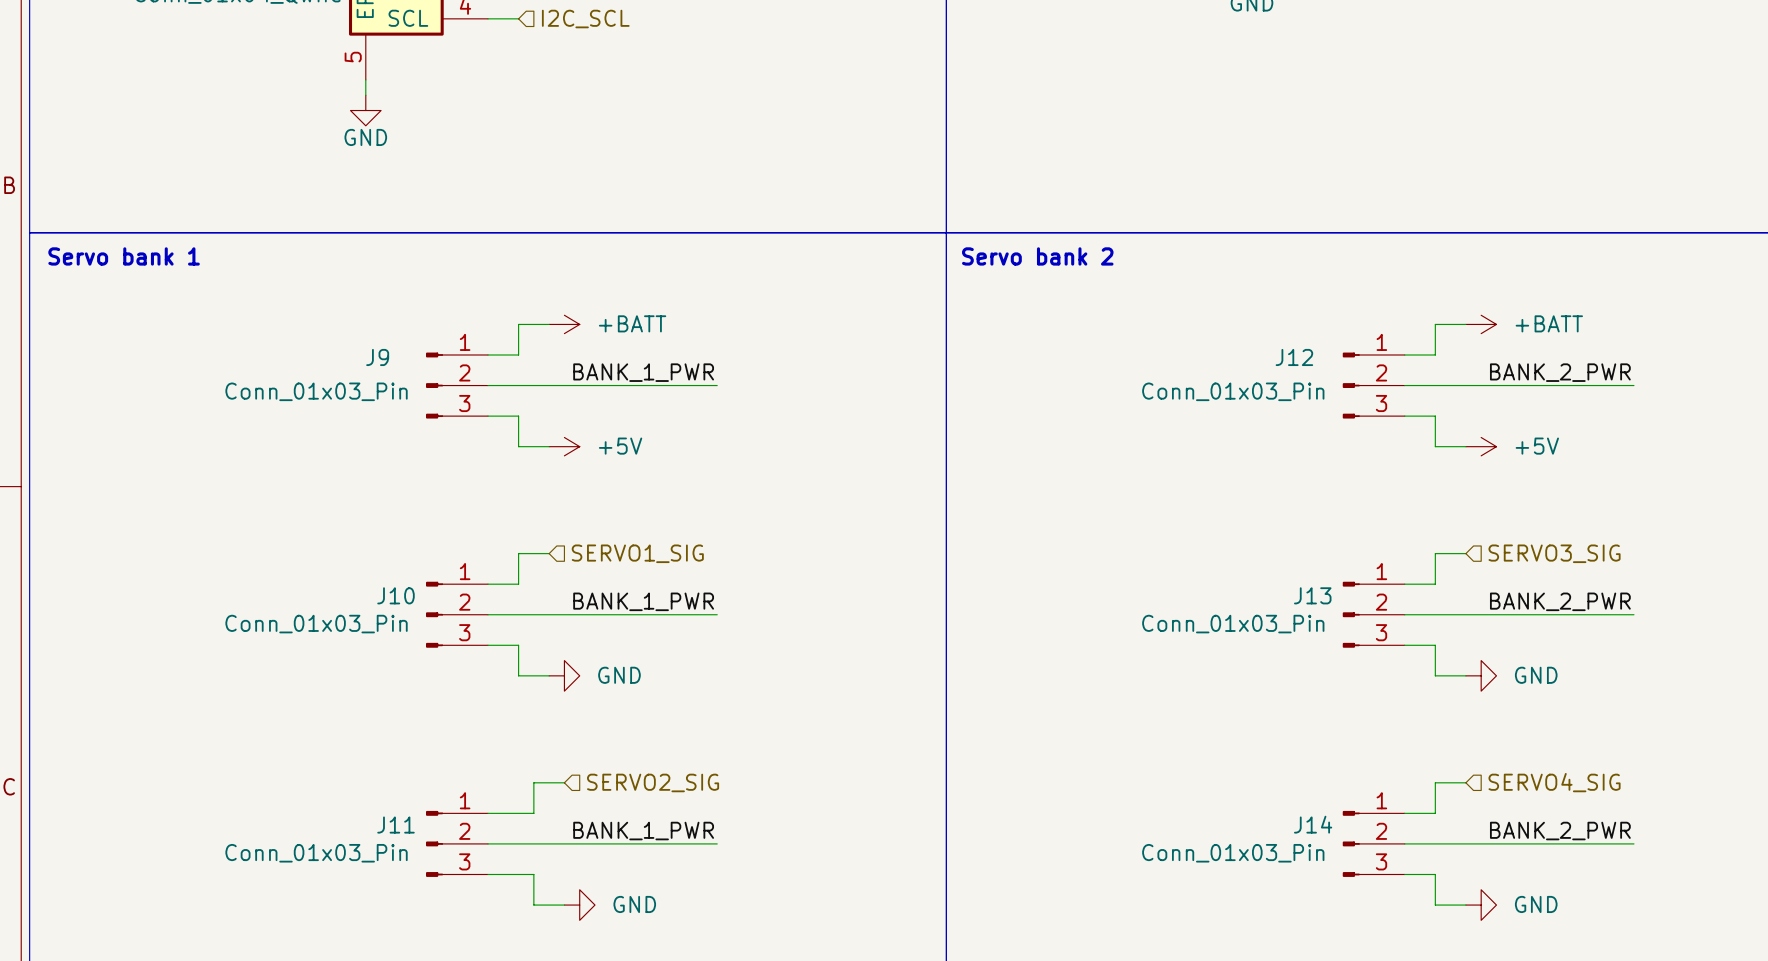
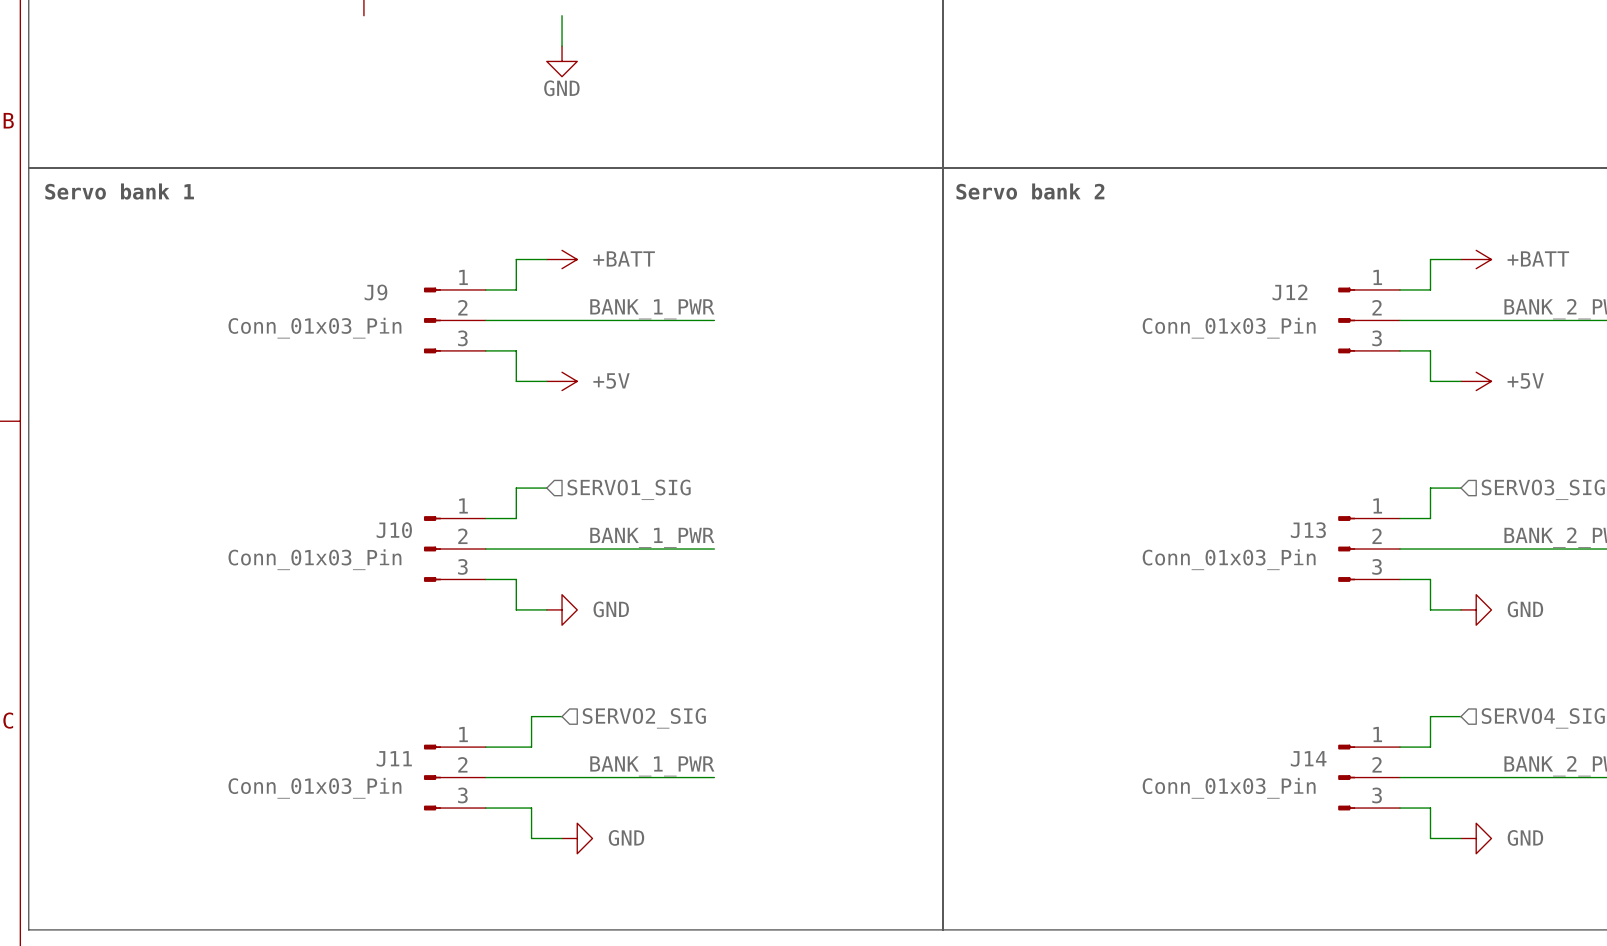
wire: (365, 79) (365, 95) -> none
wire: none -> (562, 15) (562, 46)
power symbol: GND (365, 110) -> none
power symbol: none -> GND (562, 61)

